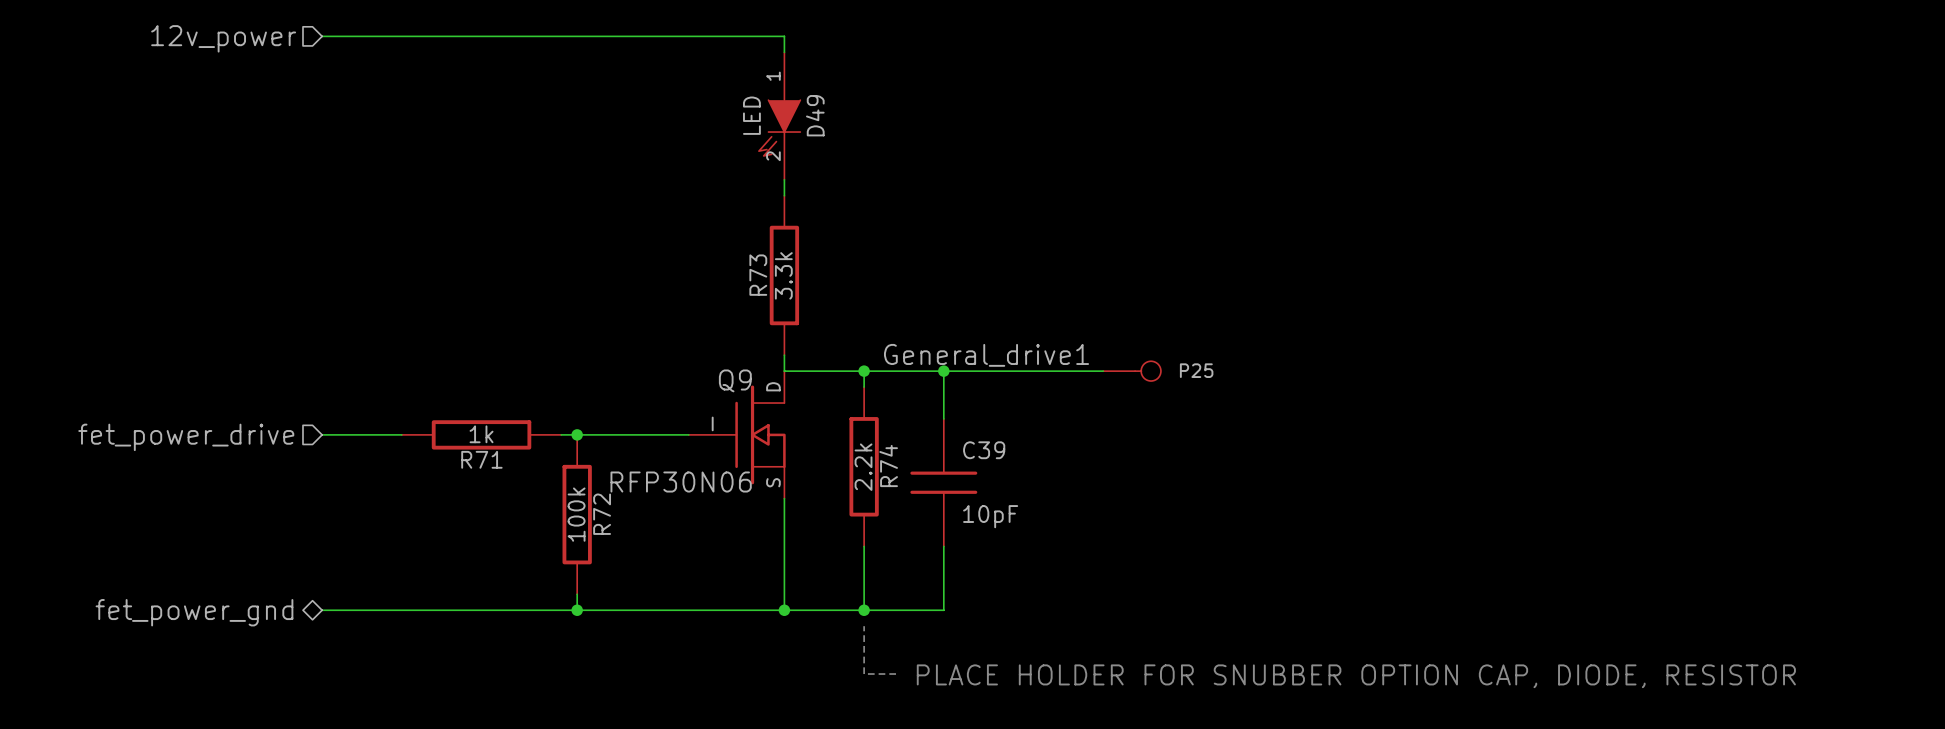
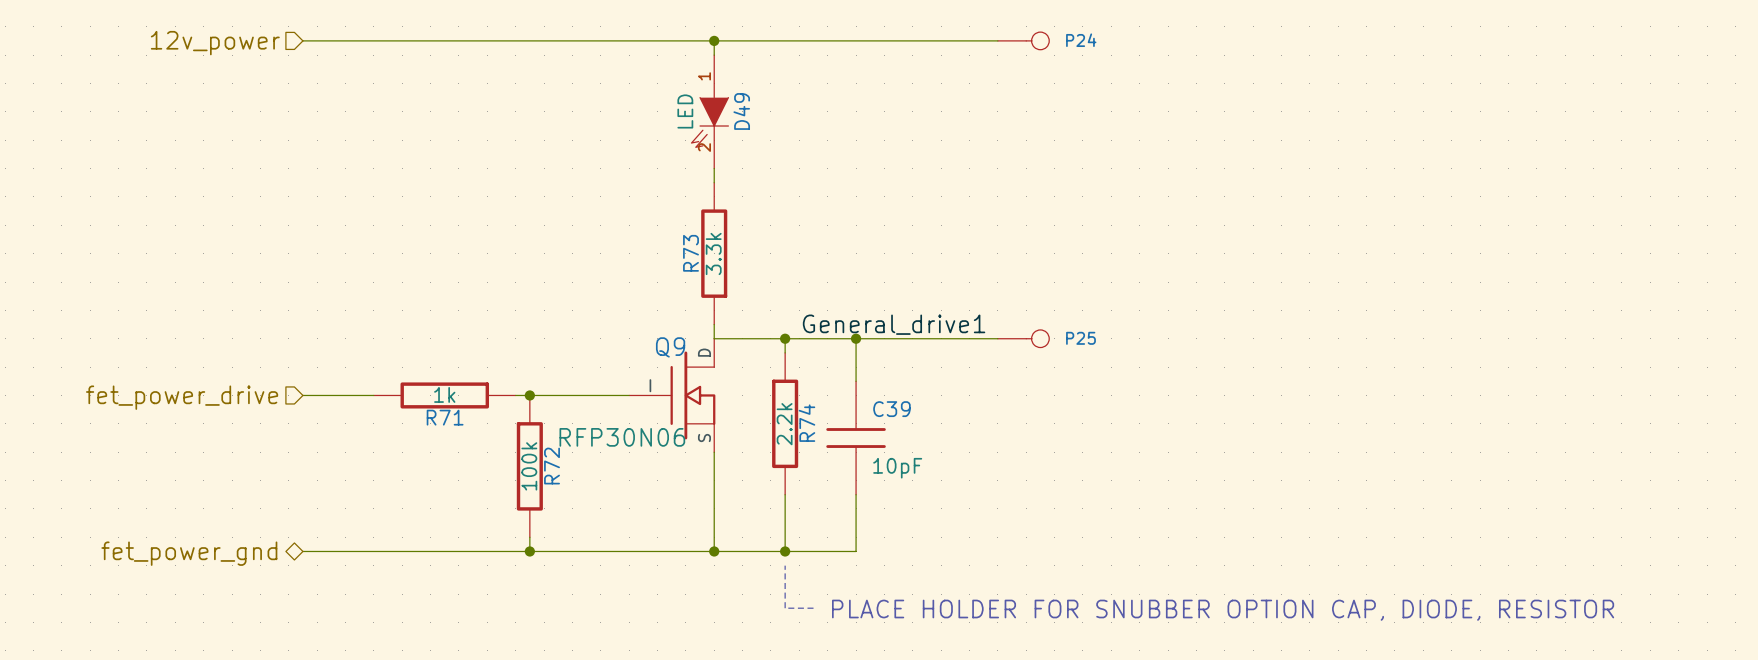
wire: none -> (714, 40) (997, 40)
junction: none -> (714, 40)
P24: none -> (1023, 40)

